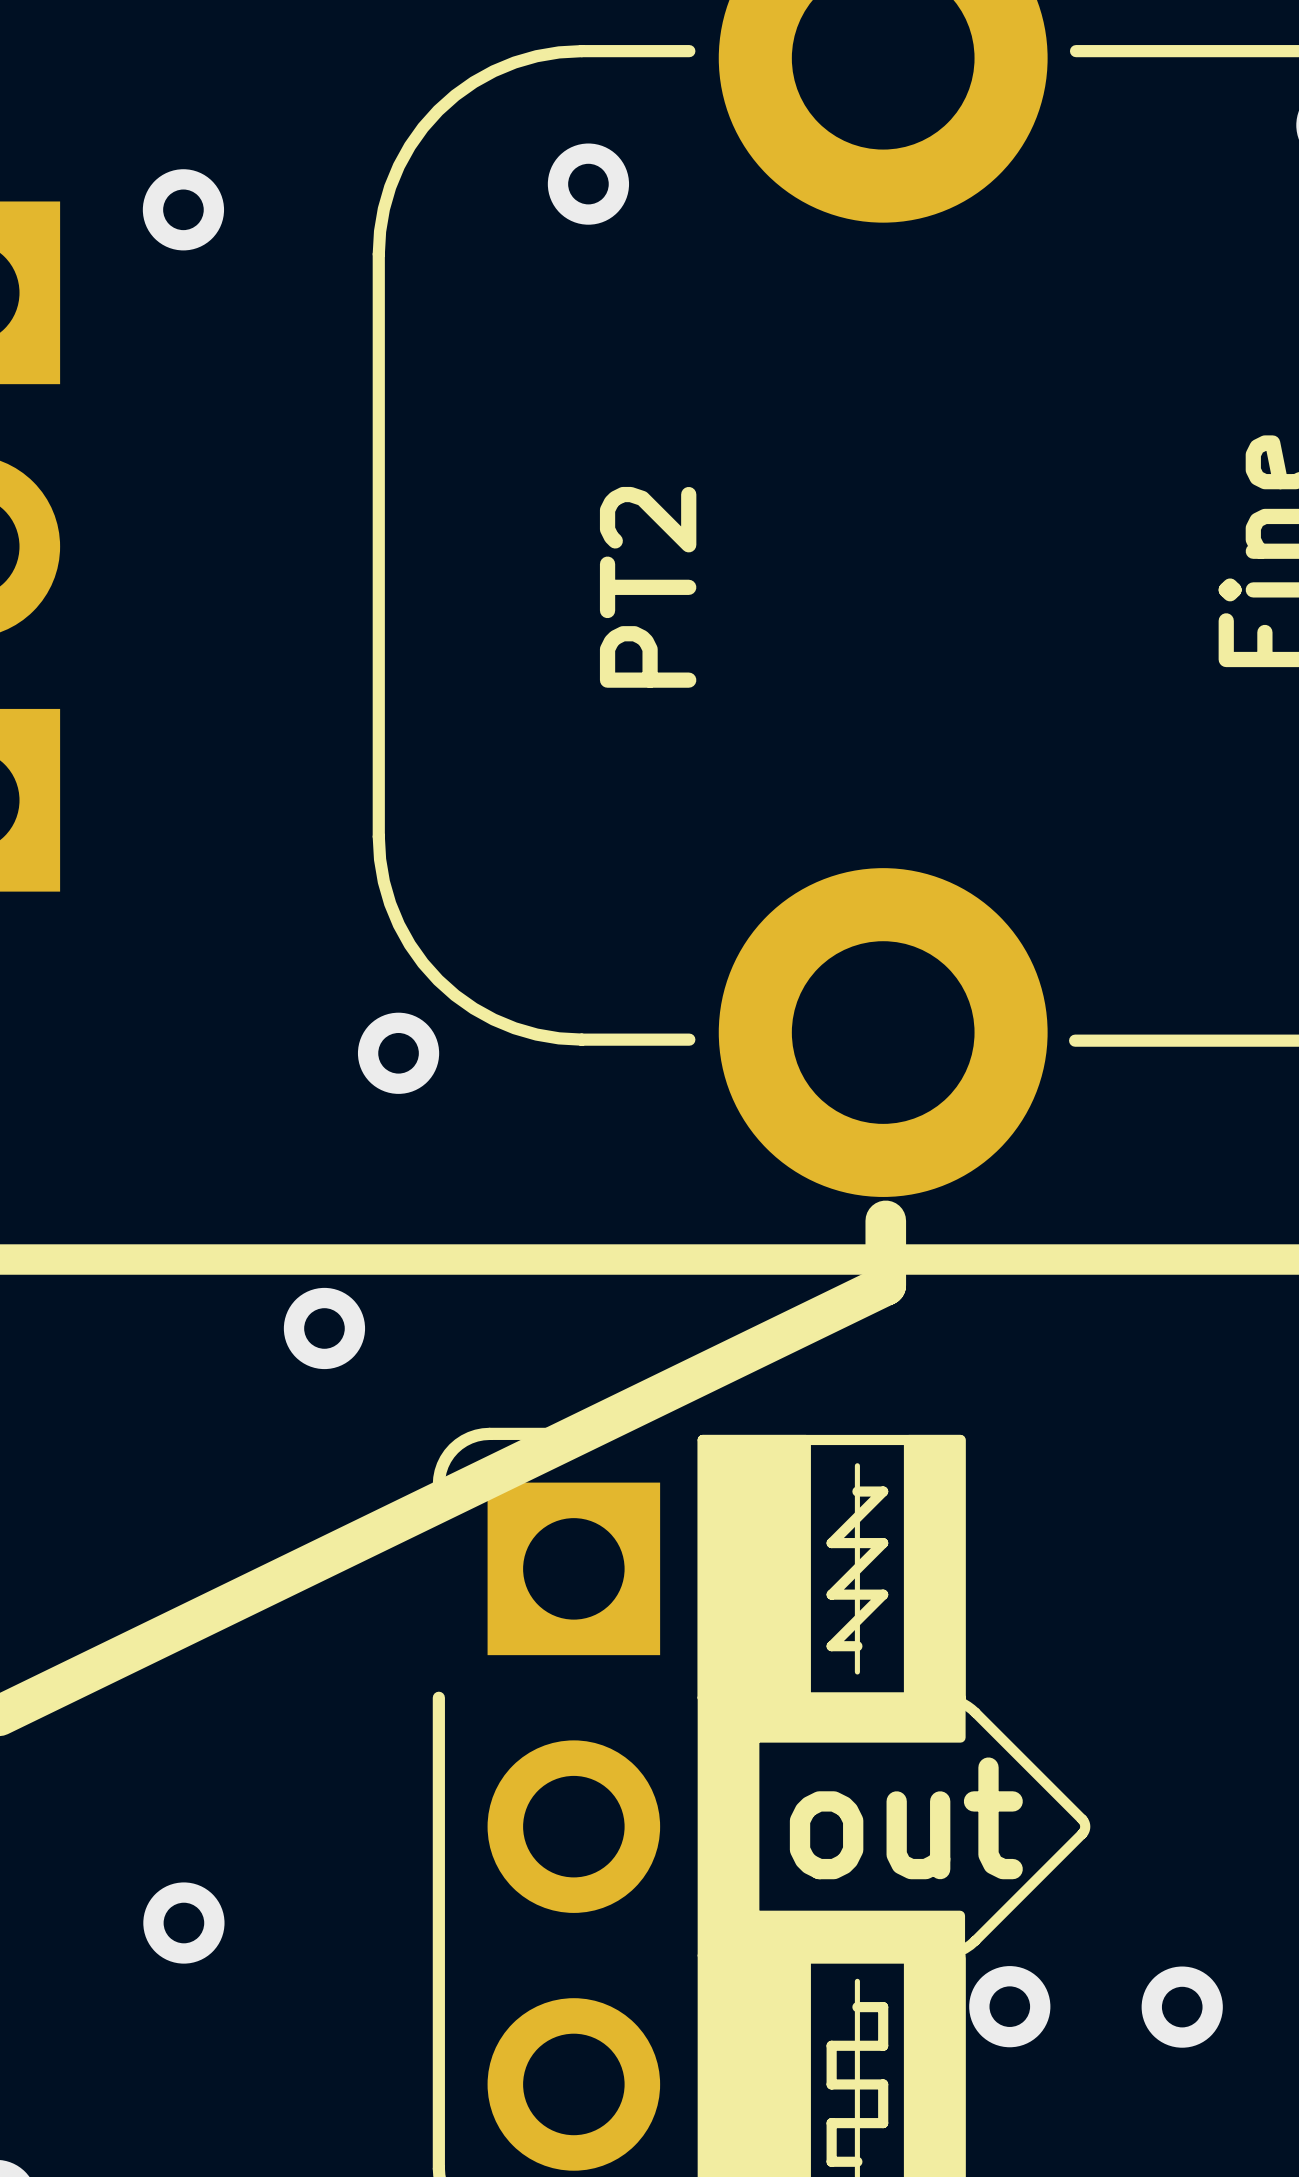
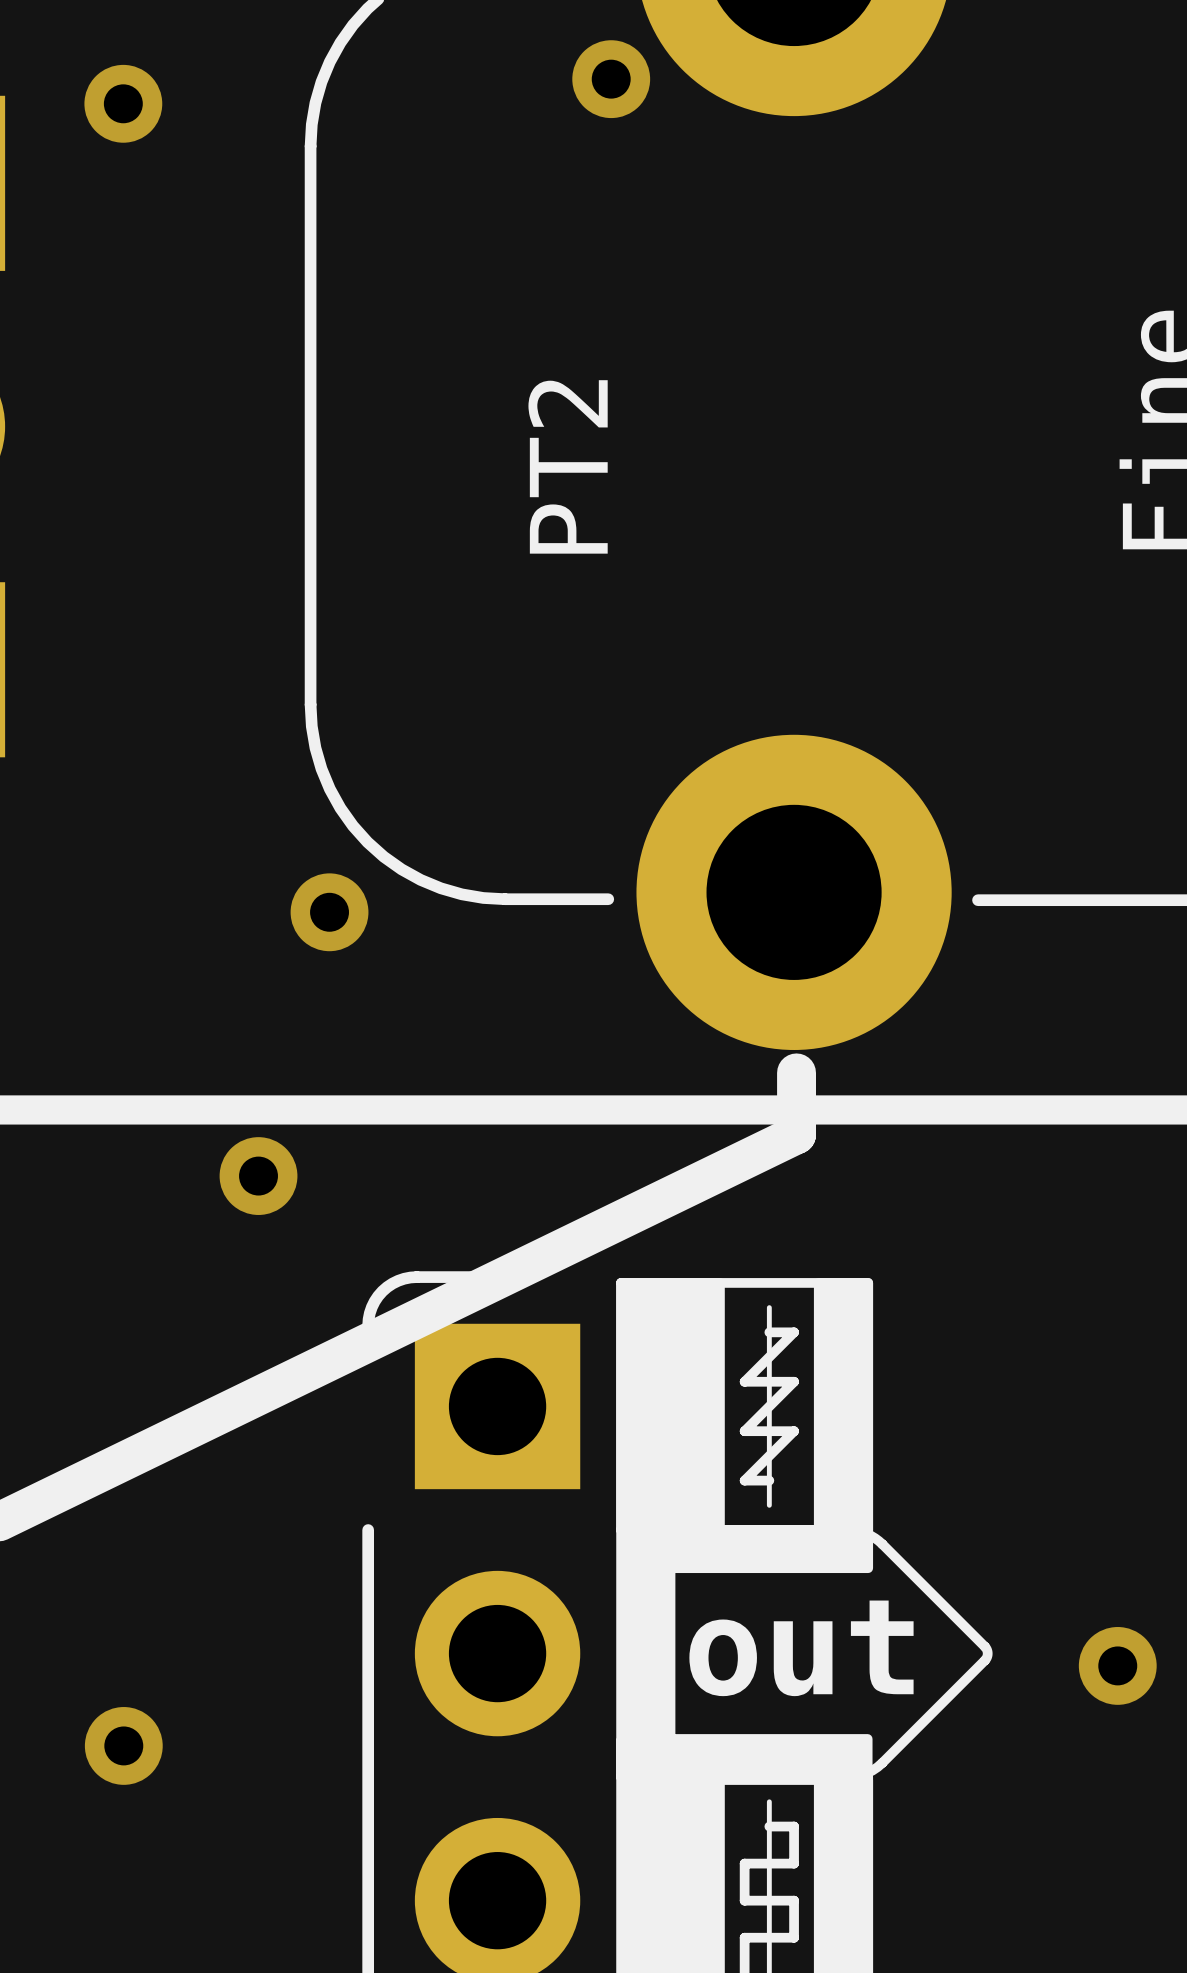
via position: (588, 184) -> (611, 79)
via: none -> (1117, 1665)
via: (1009, 2006) -> none
via: (1182, 2007) -> none

